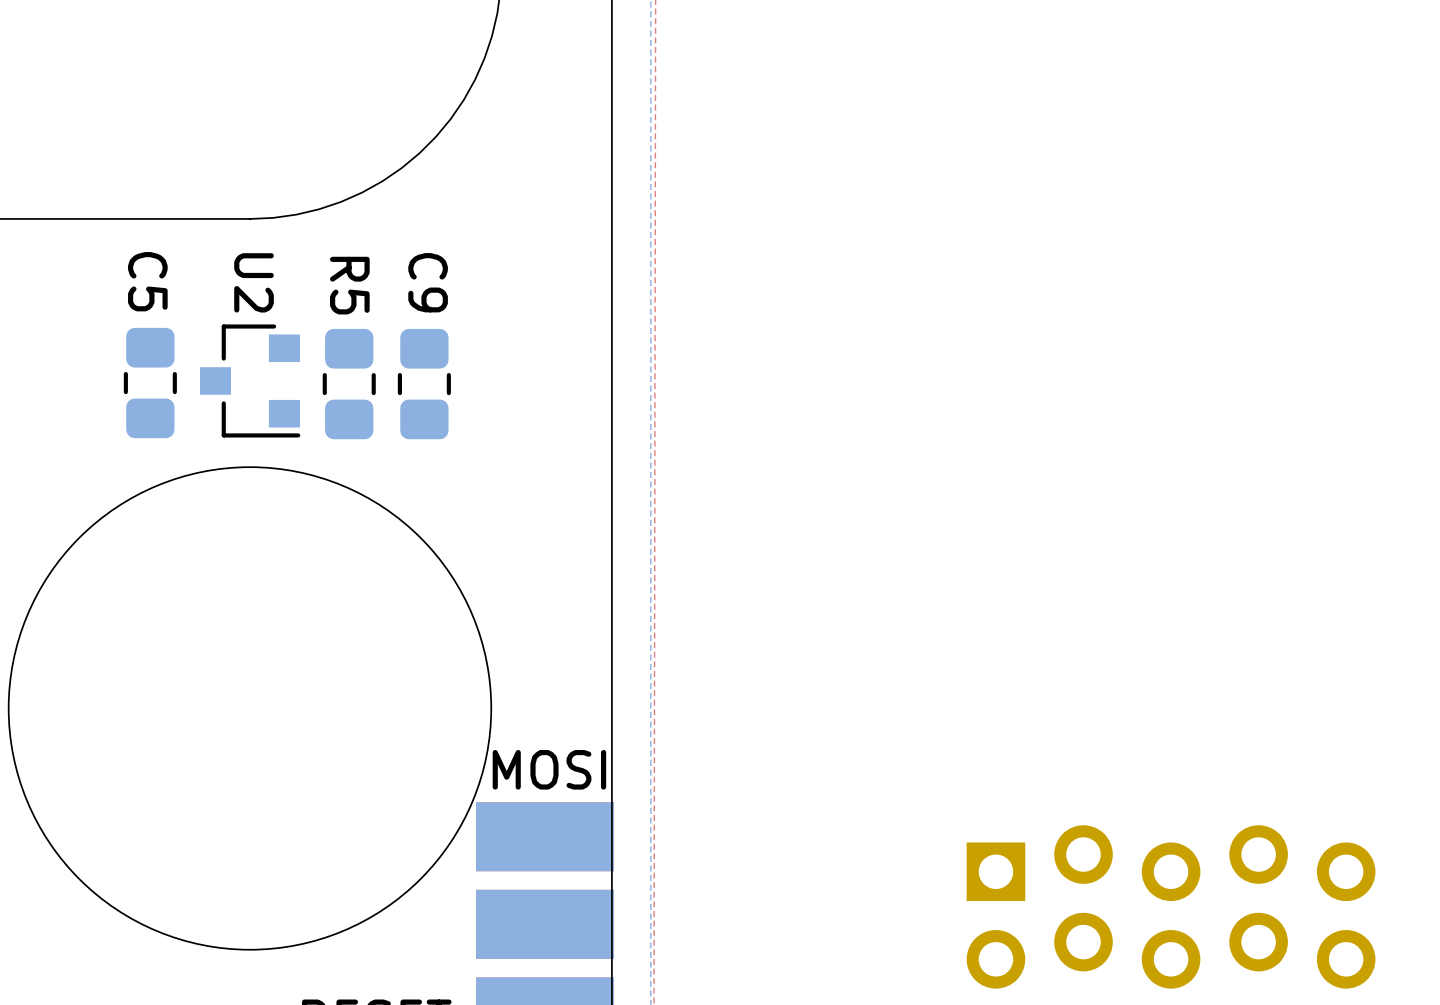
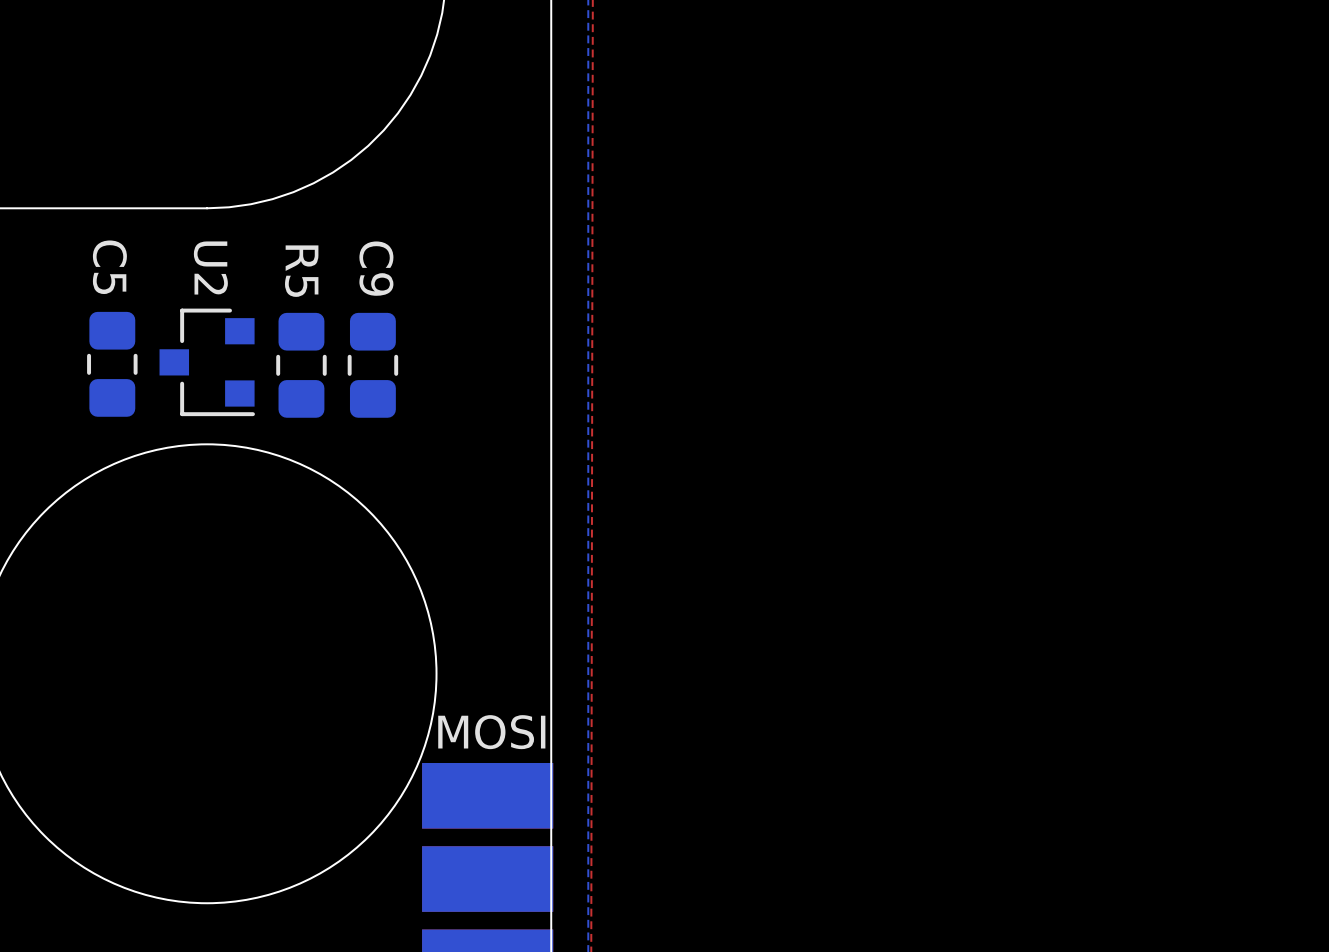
part: (1171, 906) -> none

